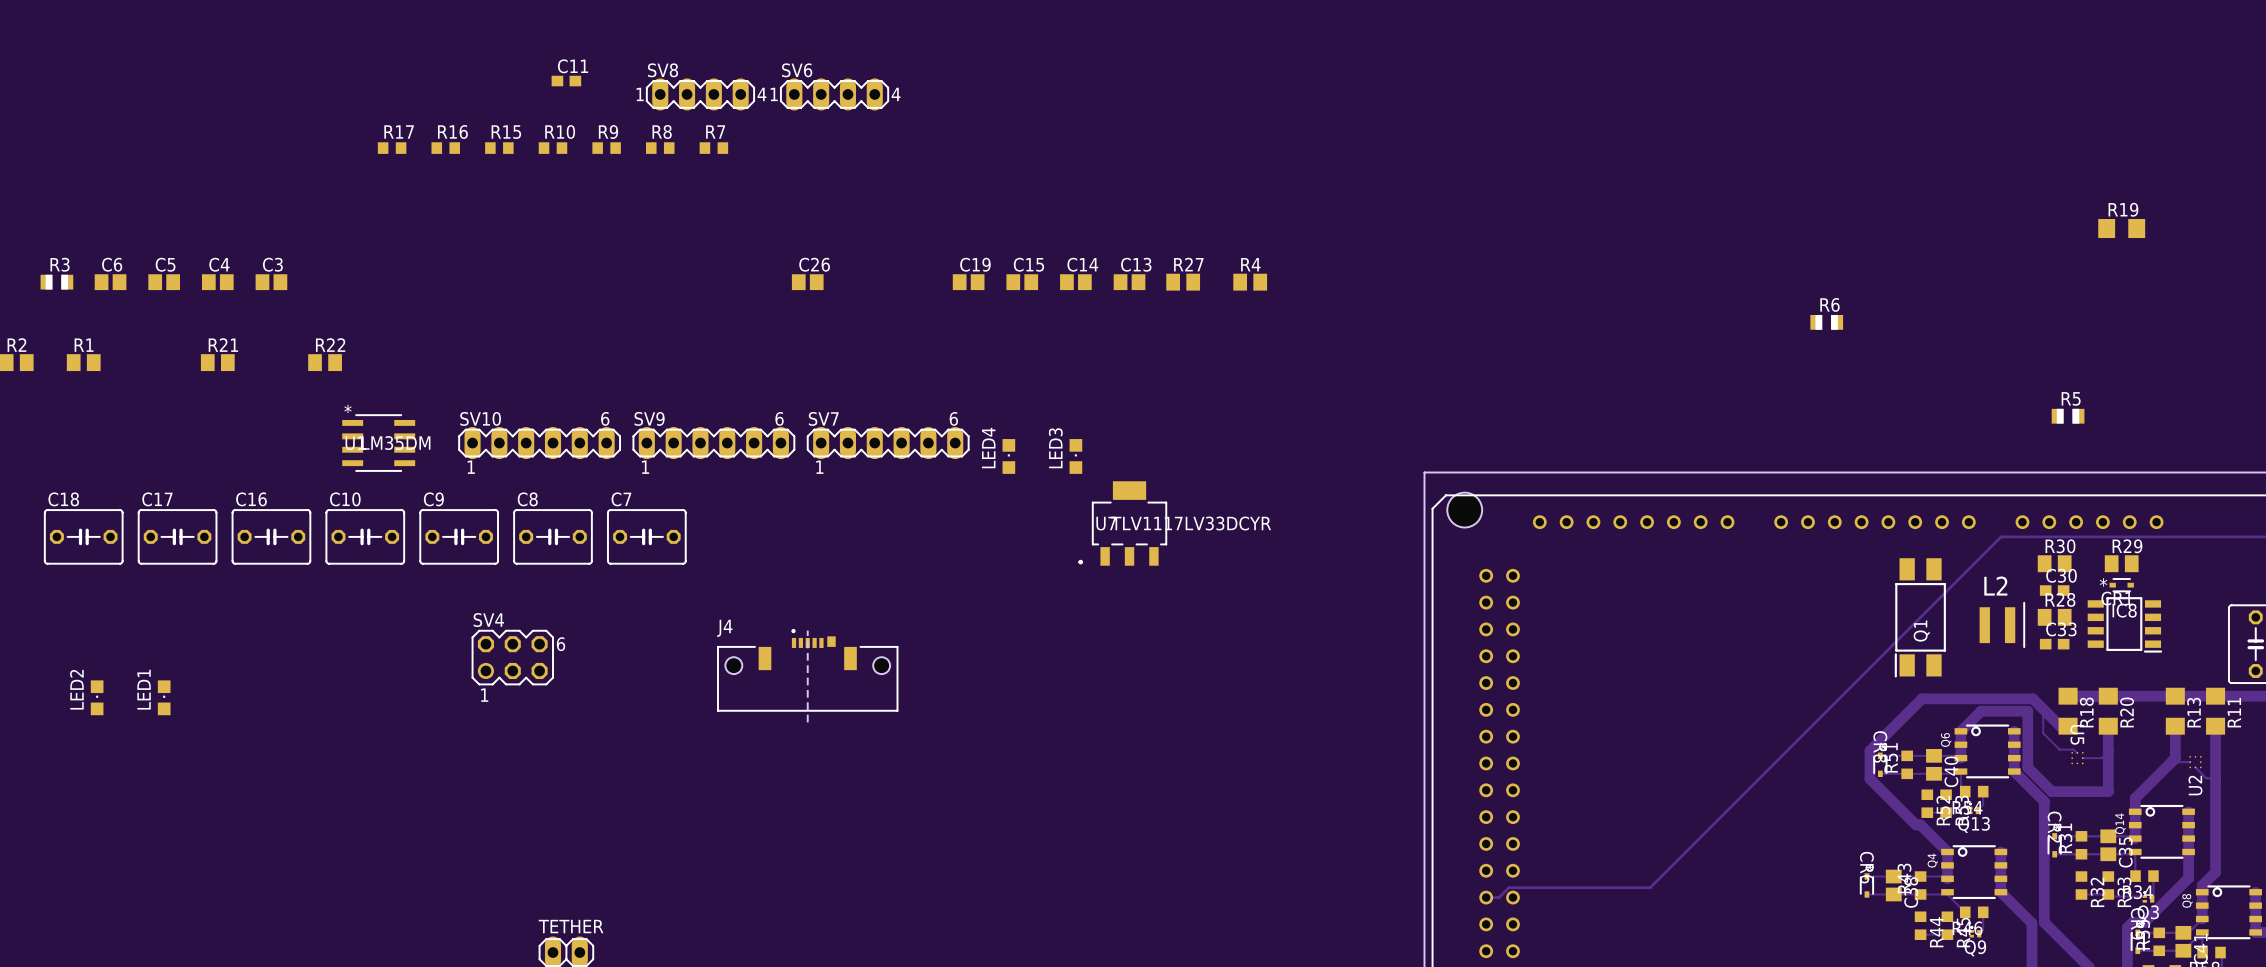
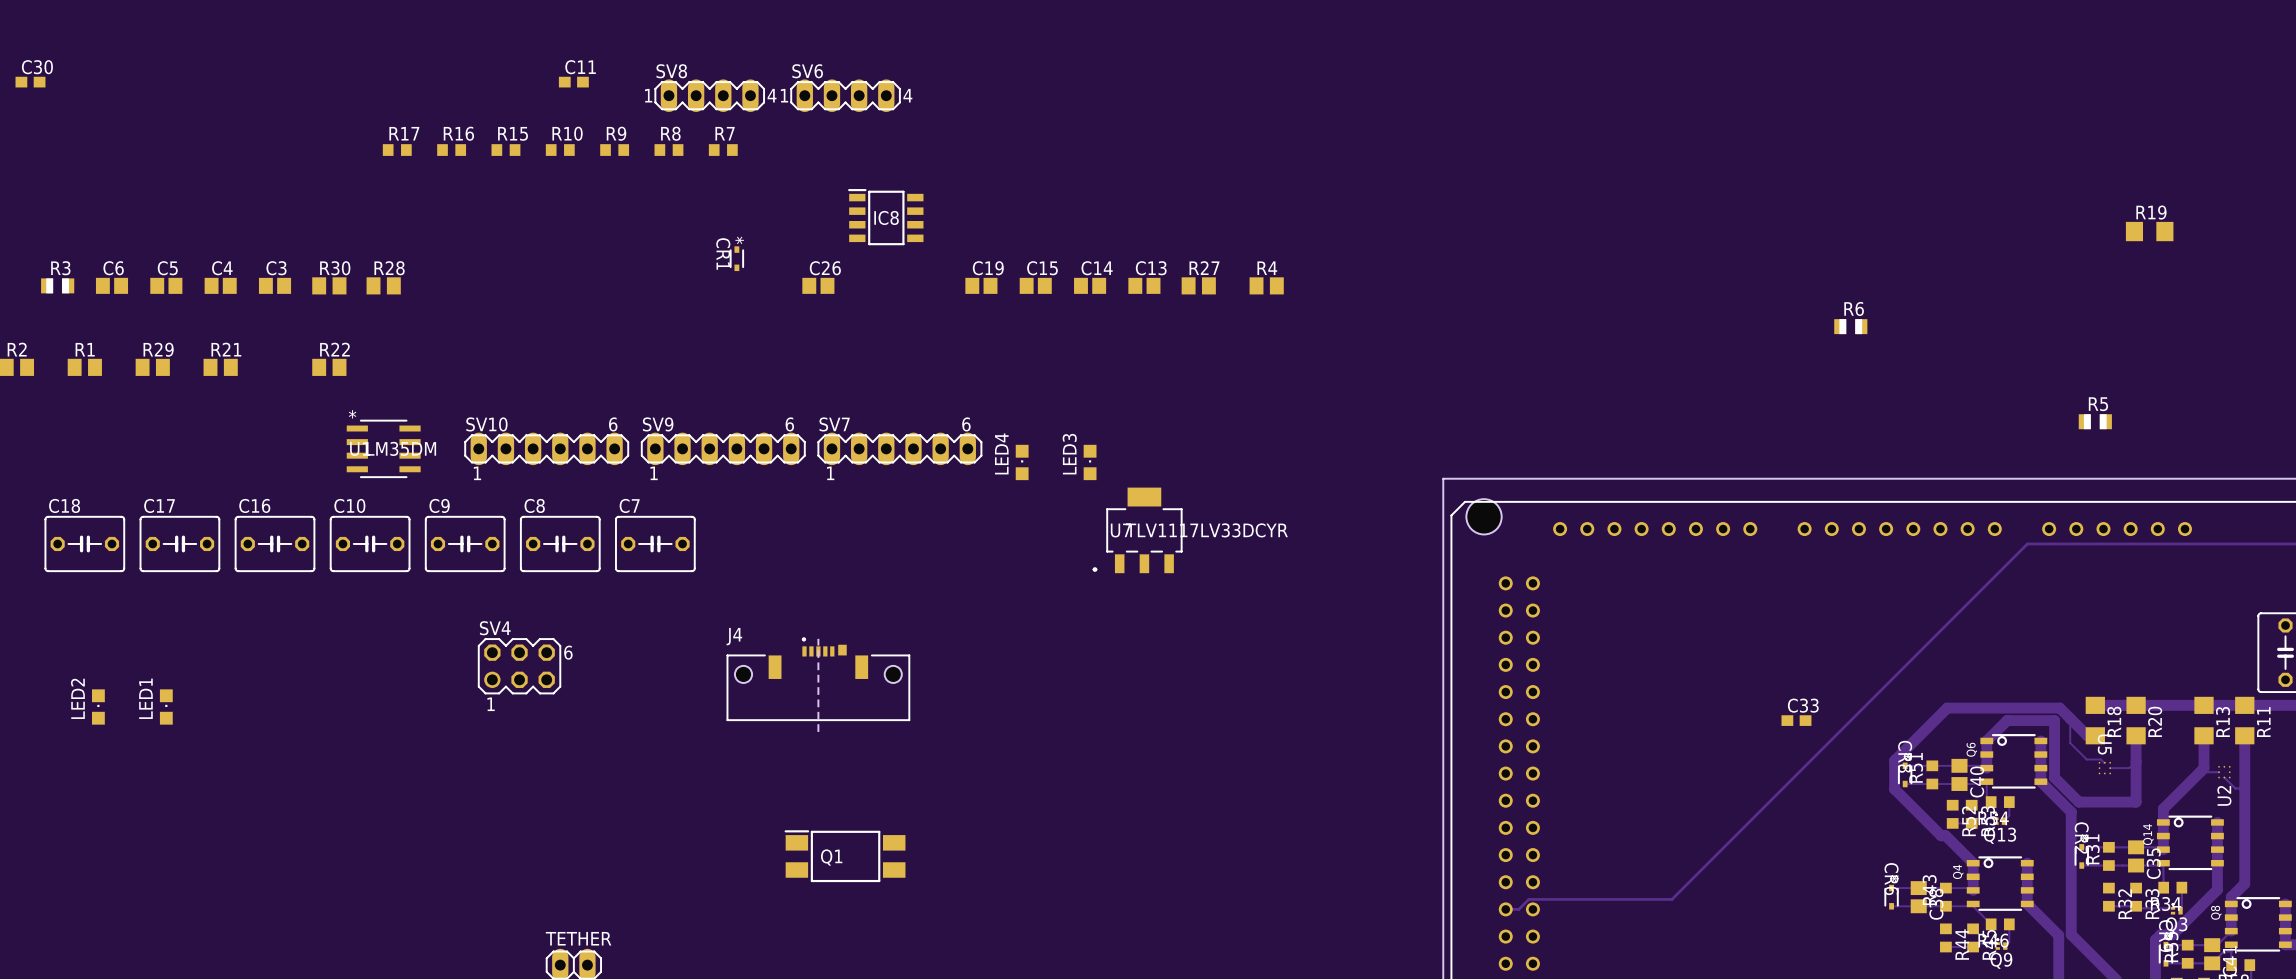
R30 position: (2054, 563) -> (329, 285)
R29 position: (2121, 563) -> (152, 367)
CR1 rotation: 0° (2121, 585) -> 90° clockwise (736, 258)
CR1 position: (2121, 585) -> (736, 258)
C30 position: (2054, 590) -> (30, 82)
Q1 rotation: 0° (1920, 617) -> 90° clockwise (845, 856)
Q1 position: (1920, 617) -> (845, 856)
R28 position: (2054, 617) -> (383, 285)
L2: (2002, 624) -> none
IC8 rotation: 0° (2124, 624) -> 180° (885, 217)
IC8 position: (2124, 624) -> (885, 217)
C33 position: (2054, 644) -> (1796, 720)

